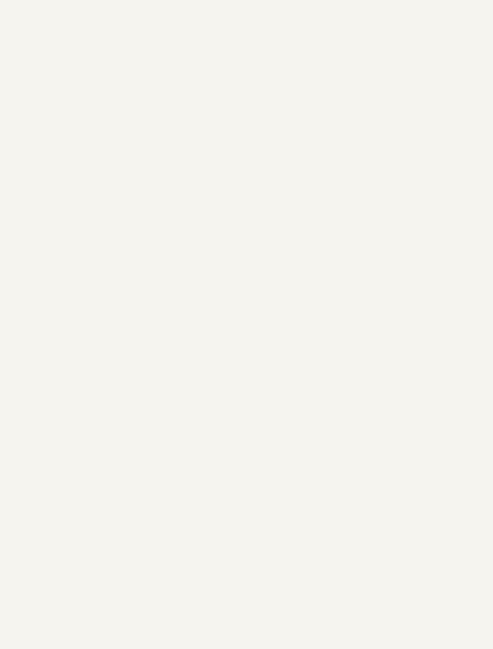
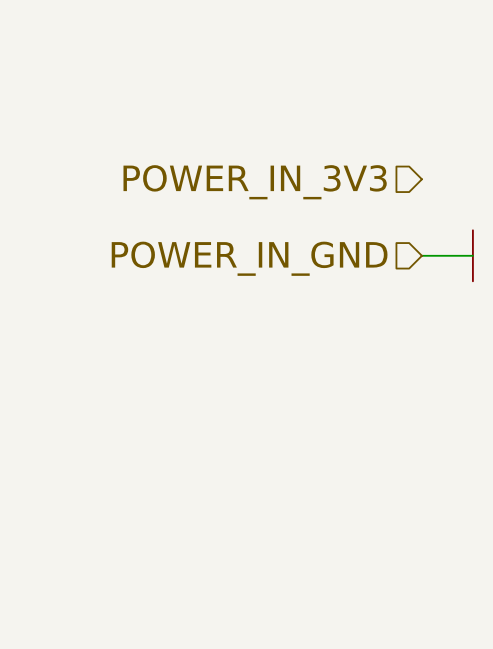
hierarchical label: none -> POWER_IN_3V3 (255, 182)
wire: none -> (421, 255) (472, 255)
power symbol: none -> (472, 255)
hierarchical label: none -> POWER_IN_GND (249, 258)

